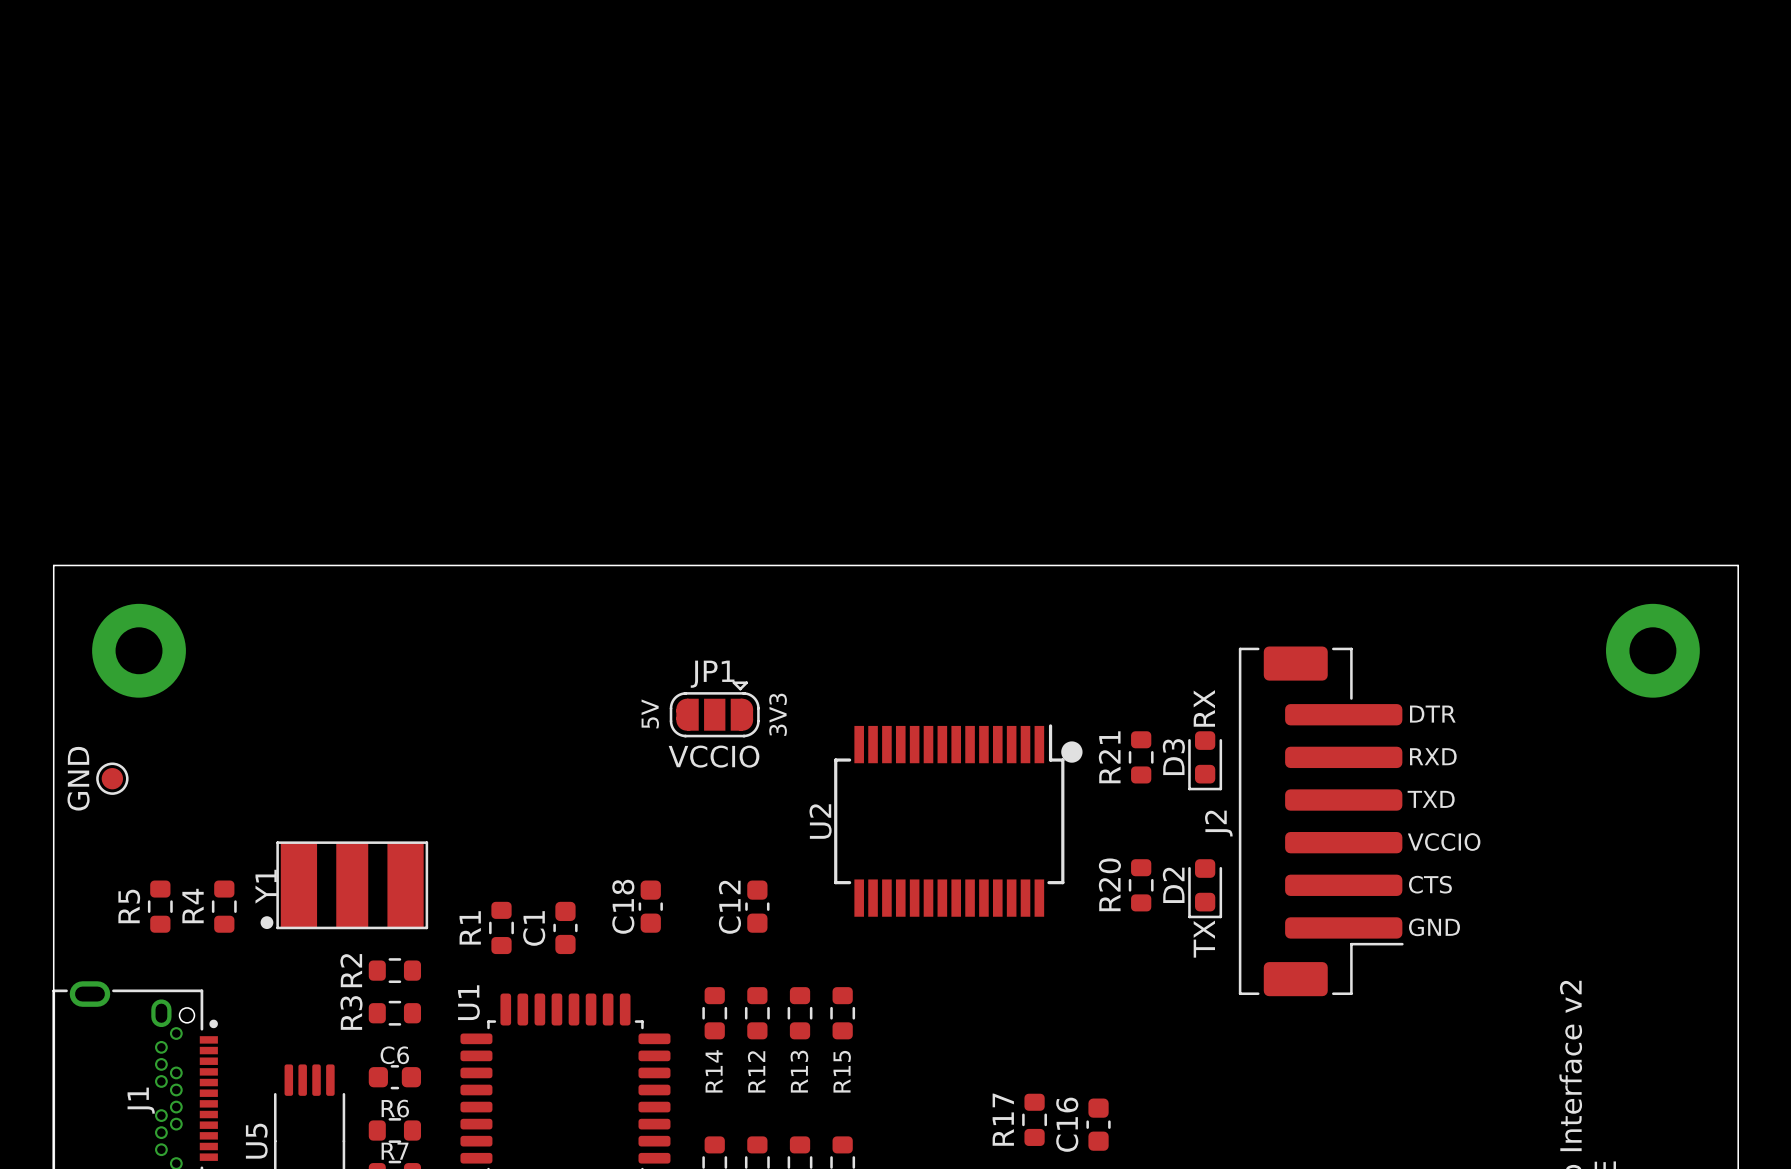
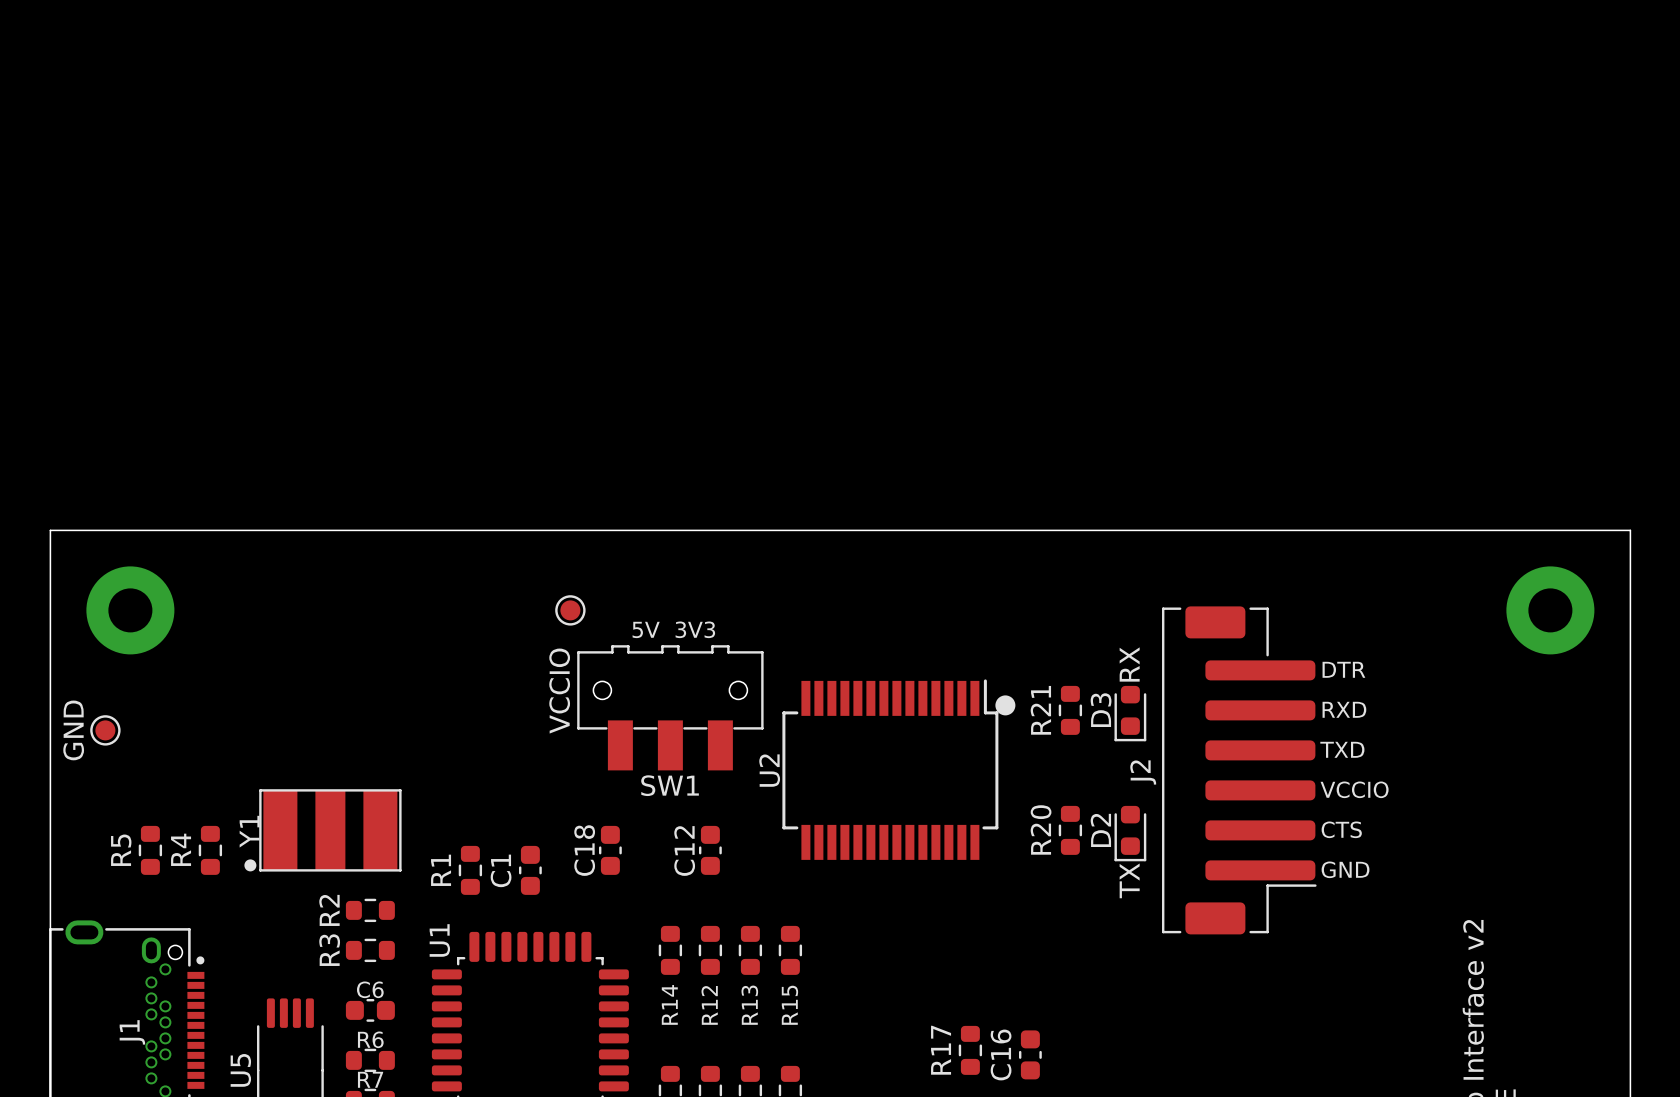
part: none -> (570, 610)
JP1: VCCIO (714, 709) -> none
SW1: none -> VCCIO (670, 707)

